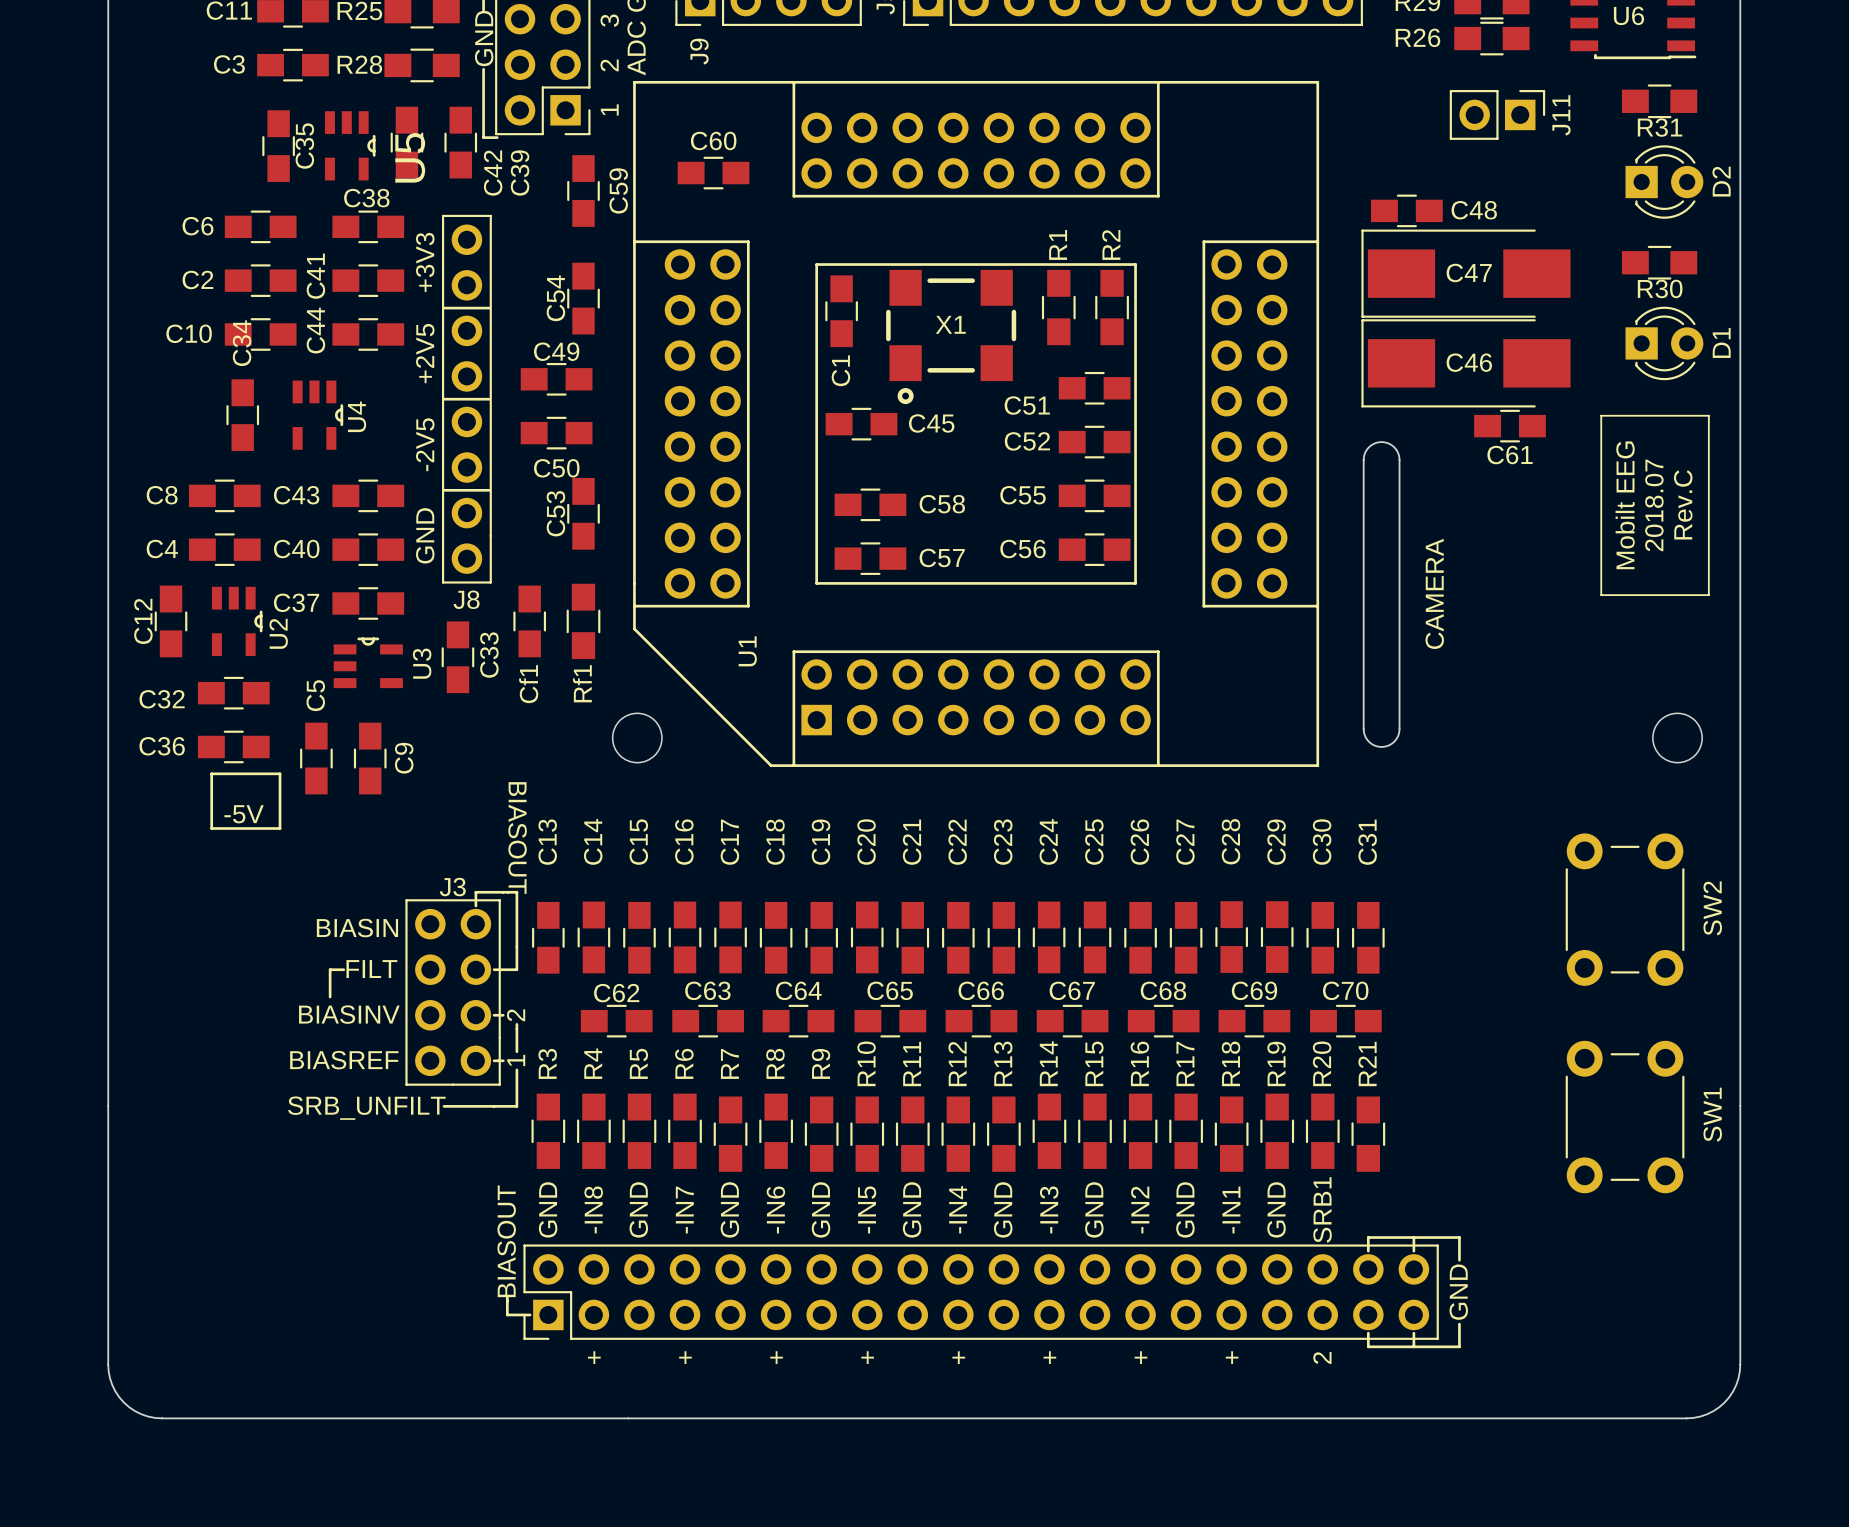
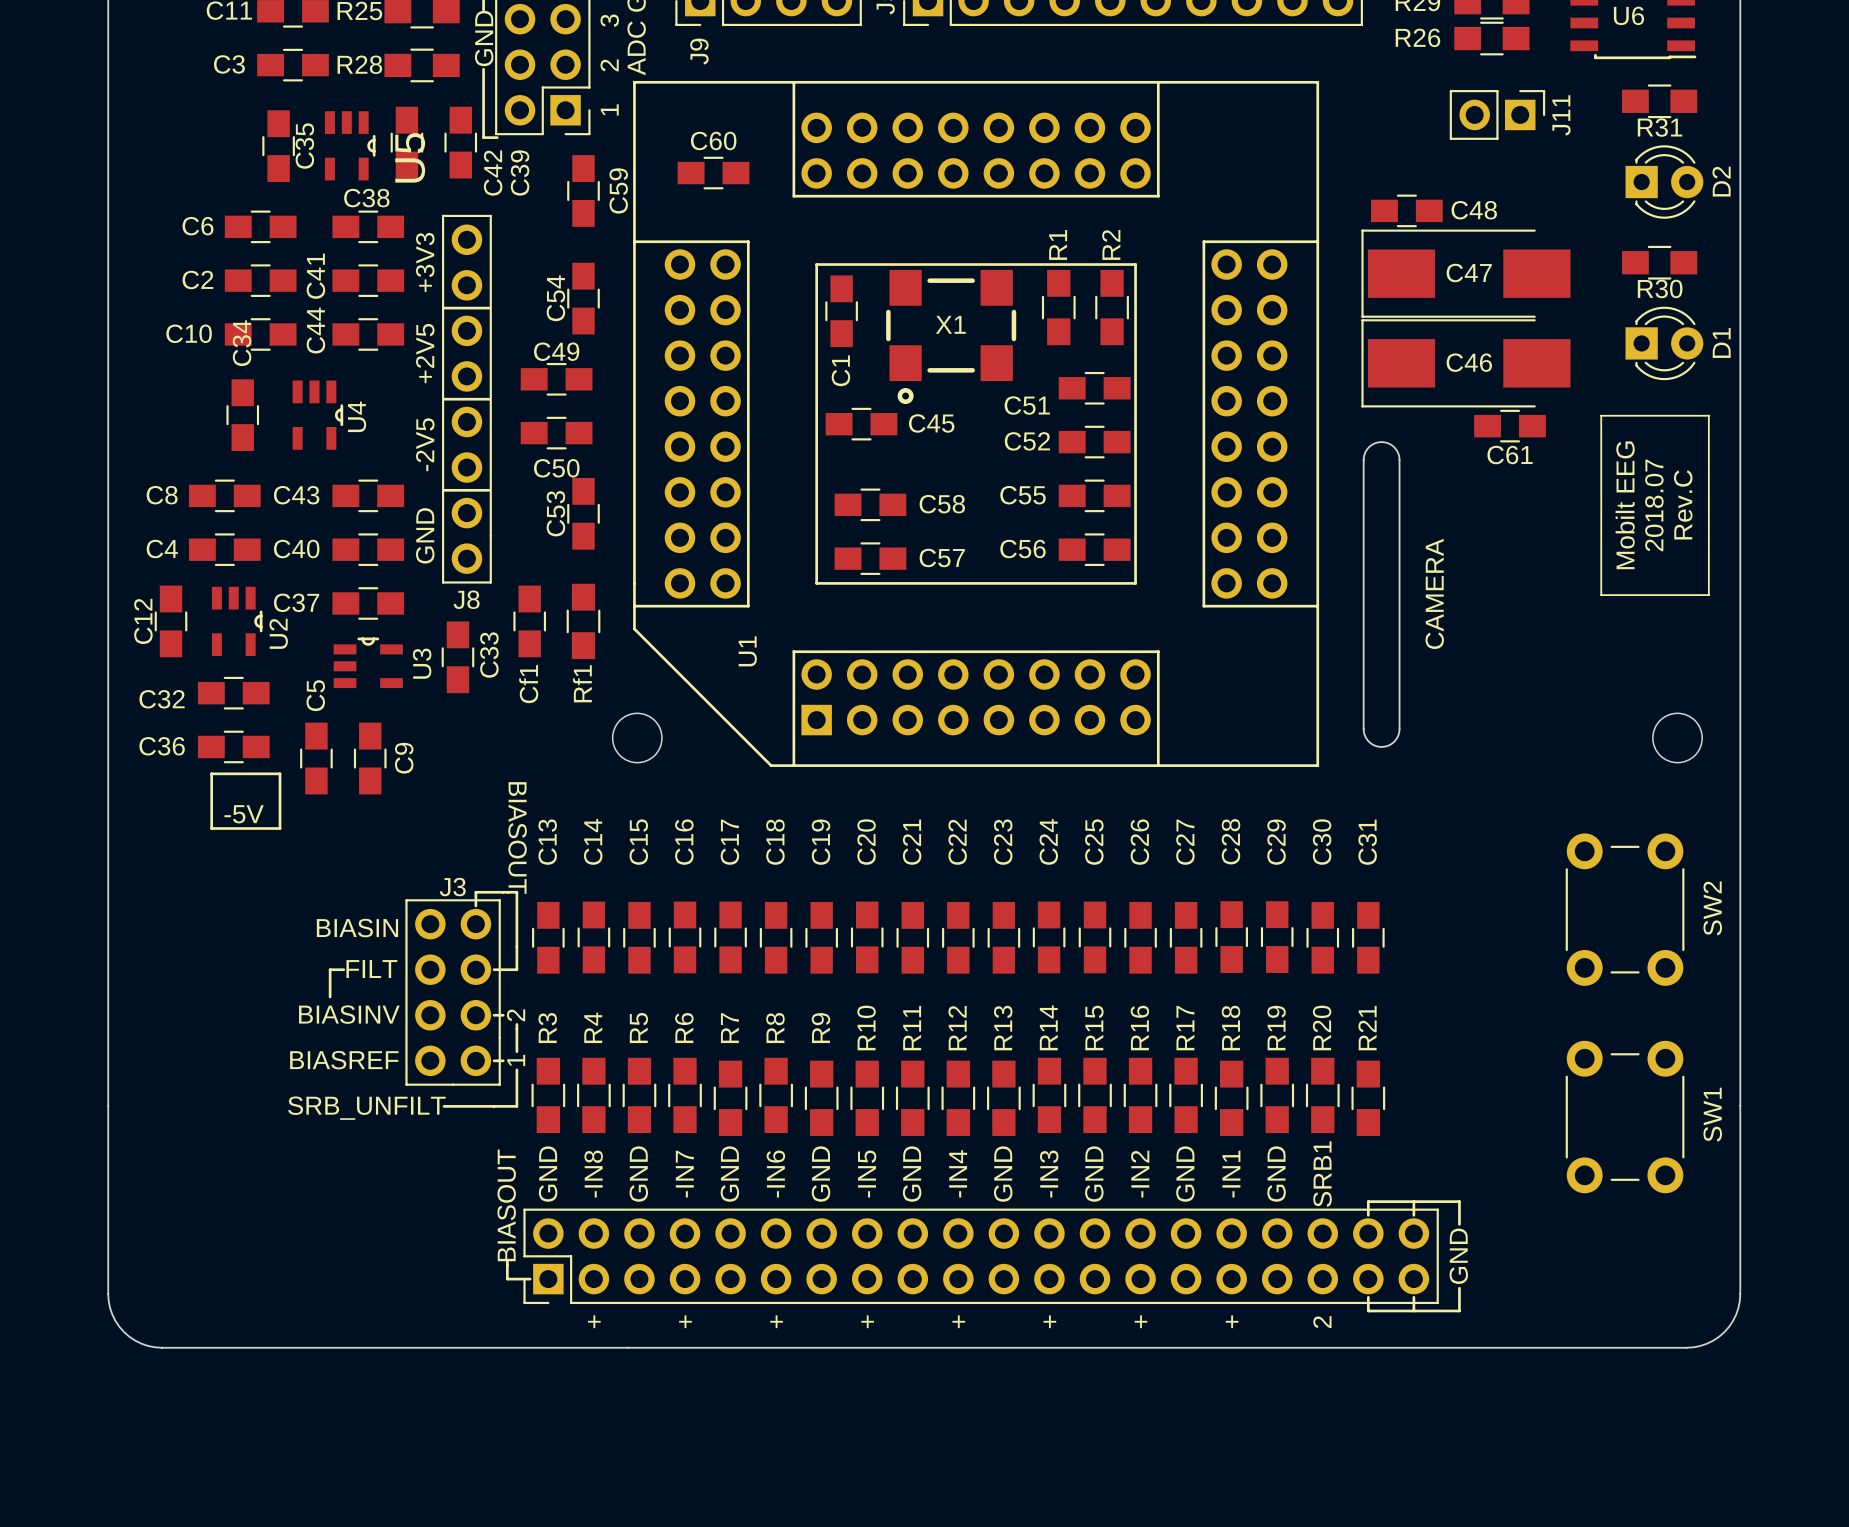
C62: (616, 1021) -> none
C63: (708, 1021) -> none
C64: (798, 1021) -> none
C65: (890, 1021) -> none
C66: (981, 1021) -> none
C67: (1072, 1021) -> none
C68: (1163, 1021) -> none
C69: (1254, 1021) -> none
C70: (1345, 1021) -> none
R3 position: (548, 1131) -> (548, 1095)
R4 position: (593, 1131) -> (593, 1095)
R5 position: (639, 1131) -> (639, 1095)
R6 position: (685, 1131) -> (685, 1095)
R8 position: (776, 1131) -> (776, 1095)
R14 position: (1049, 1131) -> (1049, 1095)
R15 position: (1095, 1131) -> (1095, 1095)
R16 position: (1140, 1131) -> (1140, 1095)
R17 position: (1186, 1131) -> (1186, 1095)
R19 position: (1277, 1131) -> (1277, 1095)
R20 position: (1322, 1131) -> (1322, 1095)
R7 position: (730, 1134) -> (730, 1098)
R9 position: (821, 1134) -> (821, 1098)
R10 position: (867, 1134) -> (867, 1098)
R11 position: (912, 1134) -> (912, 1098)
R12 position: (958, 1134) -> (958, 1098)
R13 position: (1003, 1134) -> (1003, 1098)
R18 position: (1231, 1134) -> (1231, 1098)
R21 position: (1368, 1134) -> (1368, 1098)
text position: GND (548, 1209) -> GND (548, 1174)
text position: -IN8 (593, 1209) -> -IN8 (593, 1174)
text position: GND (638, 1209) -> GND (638, 1174)
text position: GND (729, 1209) -> GND (729, 1174)
text position: -IN6 (775, 1209) -> -IN6 (775, 1174)
text position: GND (821, 1209) -> GND (821, 1174)
text position: -IN5 (867, 1209) -> -IN5 (867, 1174)
text position: GND (912, 1209) -> GND (912, 1174)
text position: -IN4 (958, 1209) -> -IN4 (958, 1173)
text position: GND (1003, 1209) -> GND (1003, 1174)
text position: -IN3 (1049, 1209) -> -IN3 (1049, 1174)
text position: GND (1094, 1209) -> GND (1094, 1174)
text position: GND (1185, 1209) -> GND (1185, 1174)
text position: GND (1276, 1209) -> GND (1276, 1174)
text position: SRB1 (1322, 1209) -> SRB1 (1322, 1174)
text position: -IN7 (684, 1210) -> -IN7 (684, 1174)
text position: -IN2 (1140, 1210) -> -IN2 (1140, 1174)
text position: -IN1 (1231, 1210) -> -IN1 (1231, 1174)
line: (1413, 1237) (1413, 1251) -> (1413, 1201) (1413, 1215)
text position: BIASOUT (506, 1241) -> BIASOUT (506, 1205)
line: (1368, 1251) (1368, 1237) (1459, 1237) (1459, 1260) -> (1368, 1215) (1368, 1201) (1459, 1201) (1459, 1224)
part position: (981, 1292) -> (981, 1256)
text position: GND (1458, 1292) -> GND (1458, 1256)
board edge: (108, 1293) (108, 1364) (112, 1385) (119, 1397) (129, 1407) (141, 1414) (162, 1418) (1693, 1417) (1707, 1414) (1719, 1407) (1729, 1397) (1736, 1385) (1740, 1364) (1740, 1293) -> (108, 1293) (112, 1314) (123, 1332) (141, 1343) (162, 1347) (1686, 1347) (1707, 1343) (1724, 1332) (1736, 1314) (1740, 1293)
line: (507, 1296) (507, 1314) (530, 1314) -> (507, 1260) (507, 1279) (530, 1279)
line: (1459, 1324) (1459, 1346) (1368, 1346) (1368, 1333) -> (1459, 1288) (1459, 1310) (1368, 1310) (1368, 1297)
line: (1413, 1333) (1413, 1346) -> (1413, 1297) (1413, 1310)
text position: + (594, 1357) -> + (594, 1321)
text position: + (685, 1357) -> + (685, 1321)
text position: + (776, 1357) -> + (776, 1321)
text position: + (867, 1357) -> + (867, 1321)
text position: + (958, 1357) -> + (958, 1321)
text position: + (1049, 1357) -> + (1049, 1321)
text position: + (1141, 1357) -> + (1141, 1321)
text position: + (1232, 1357) -> + (1232, 1321)
text position: 2 (1322, 1358) -> 2 (1322, 1322)

